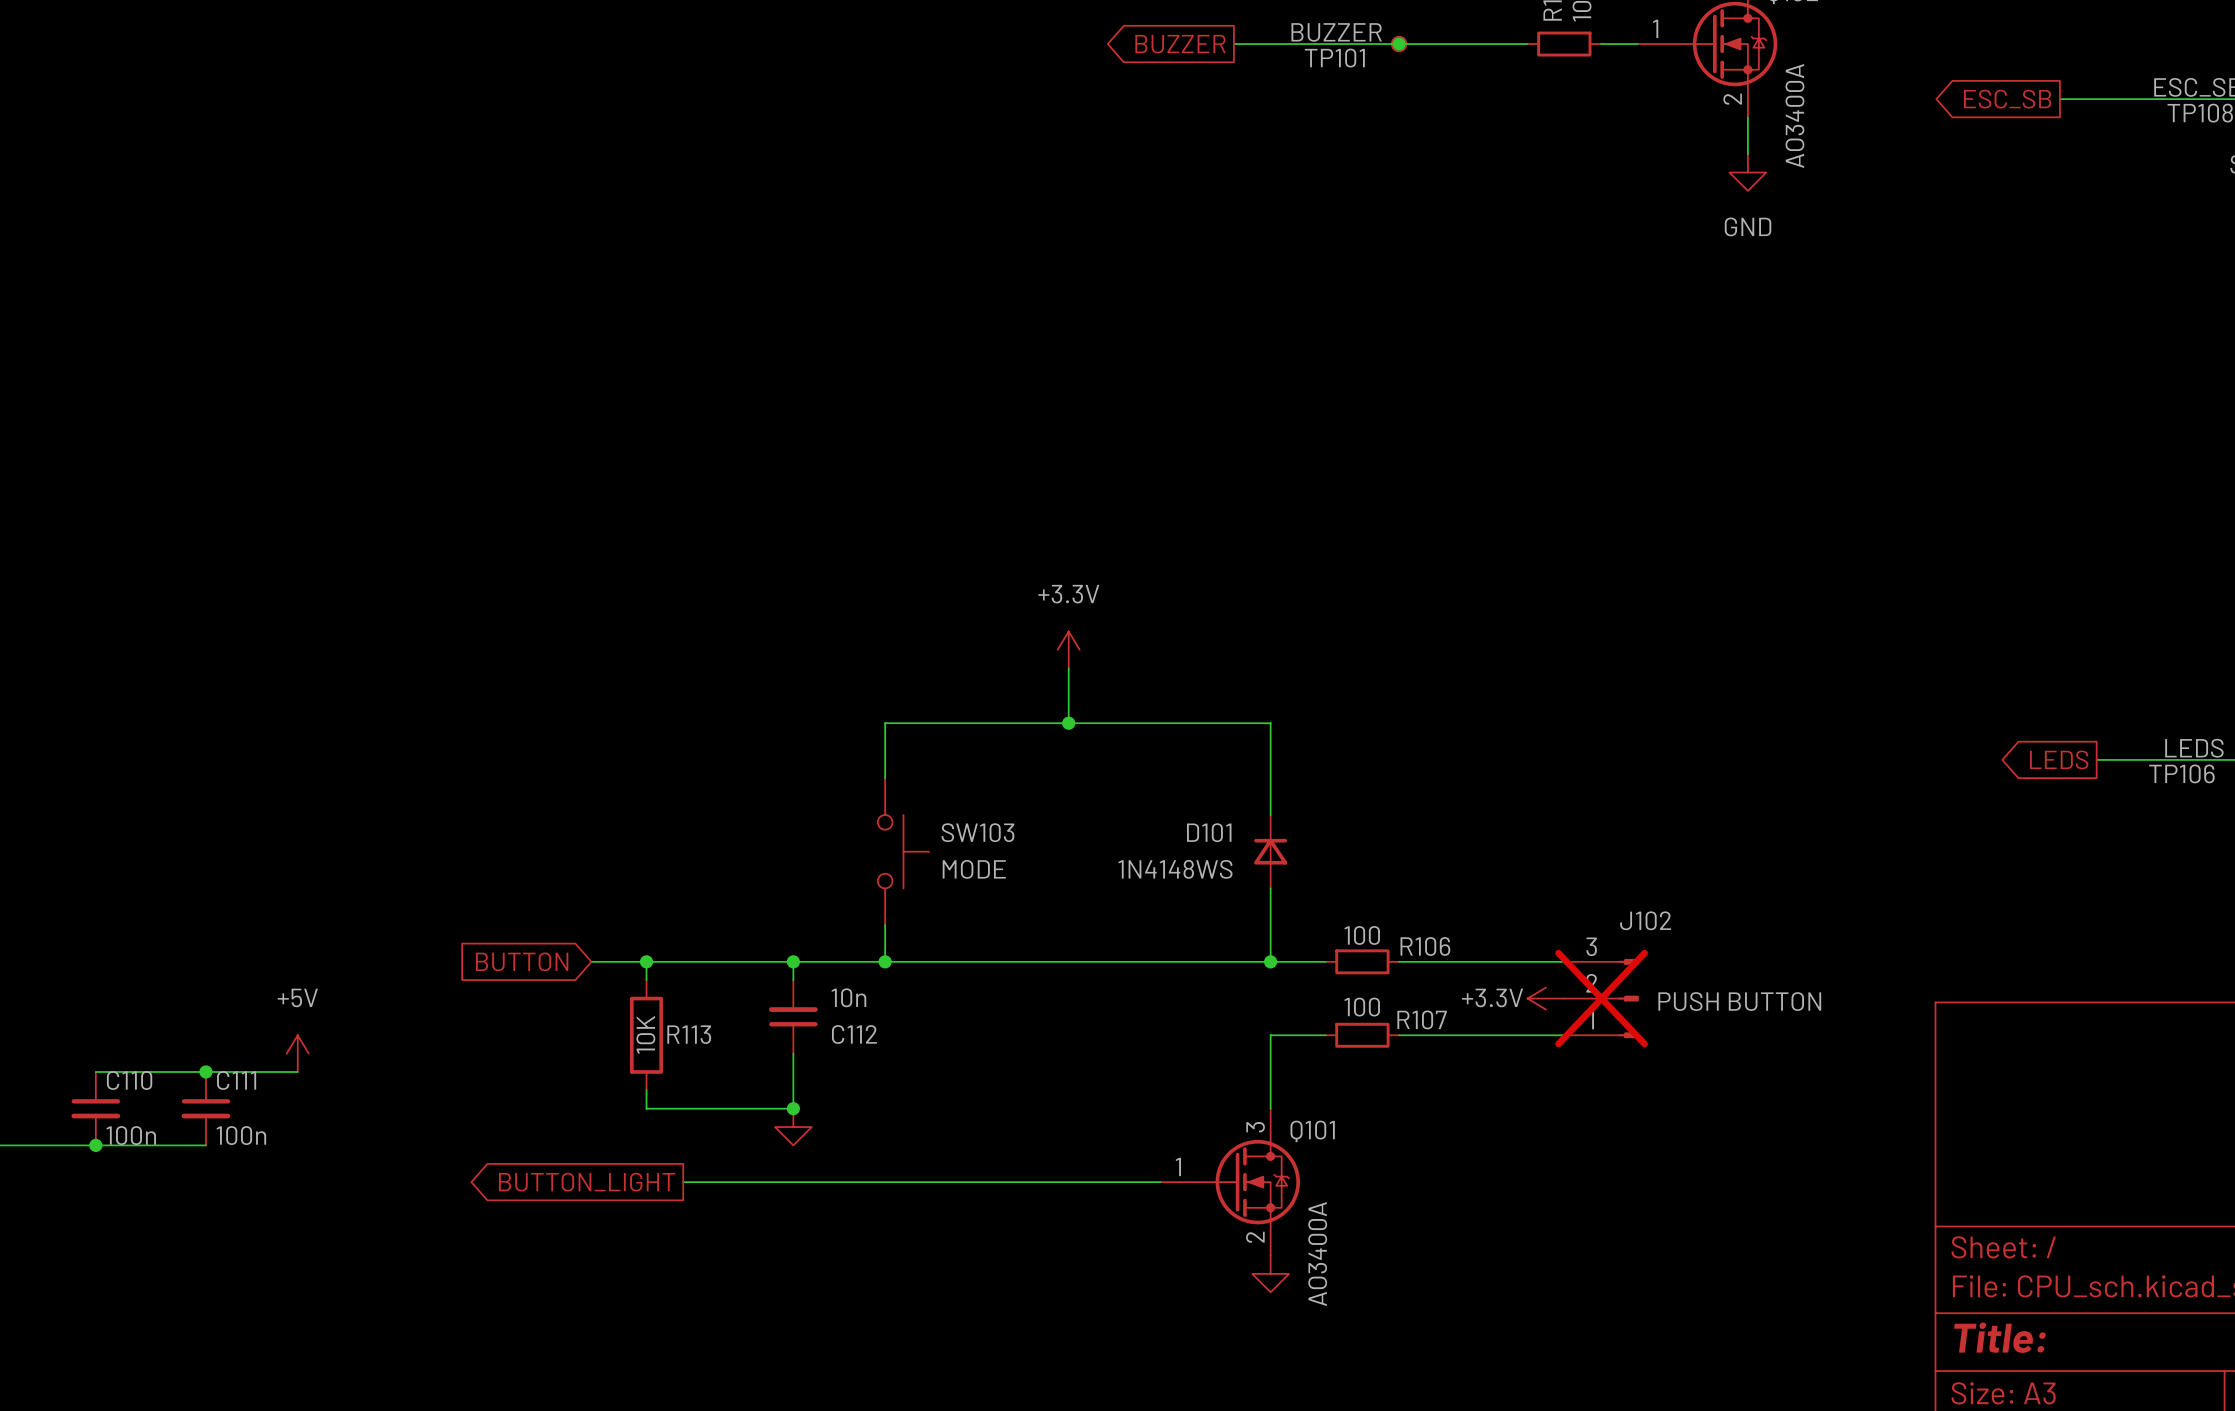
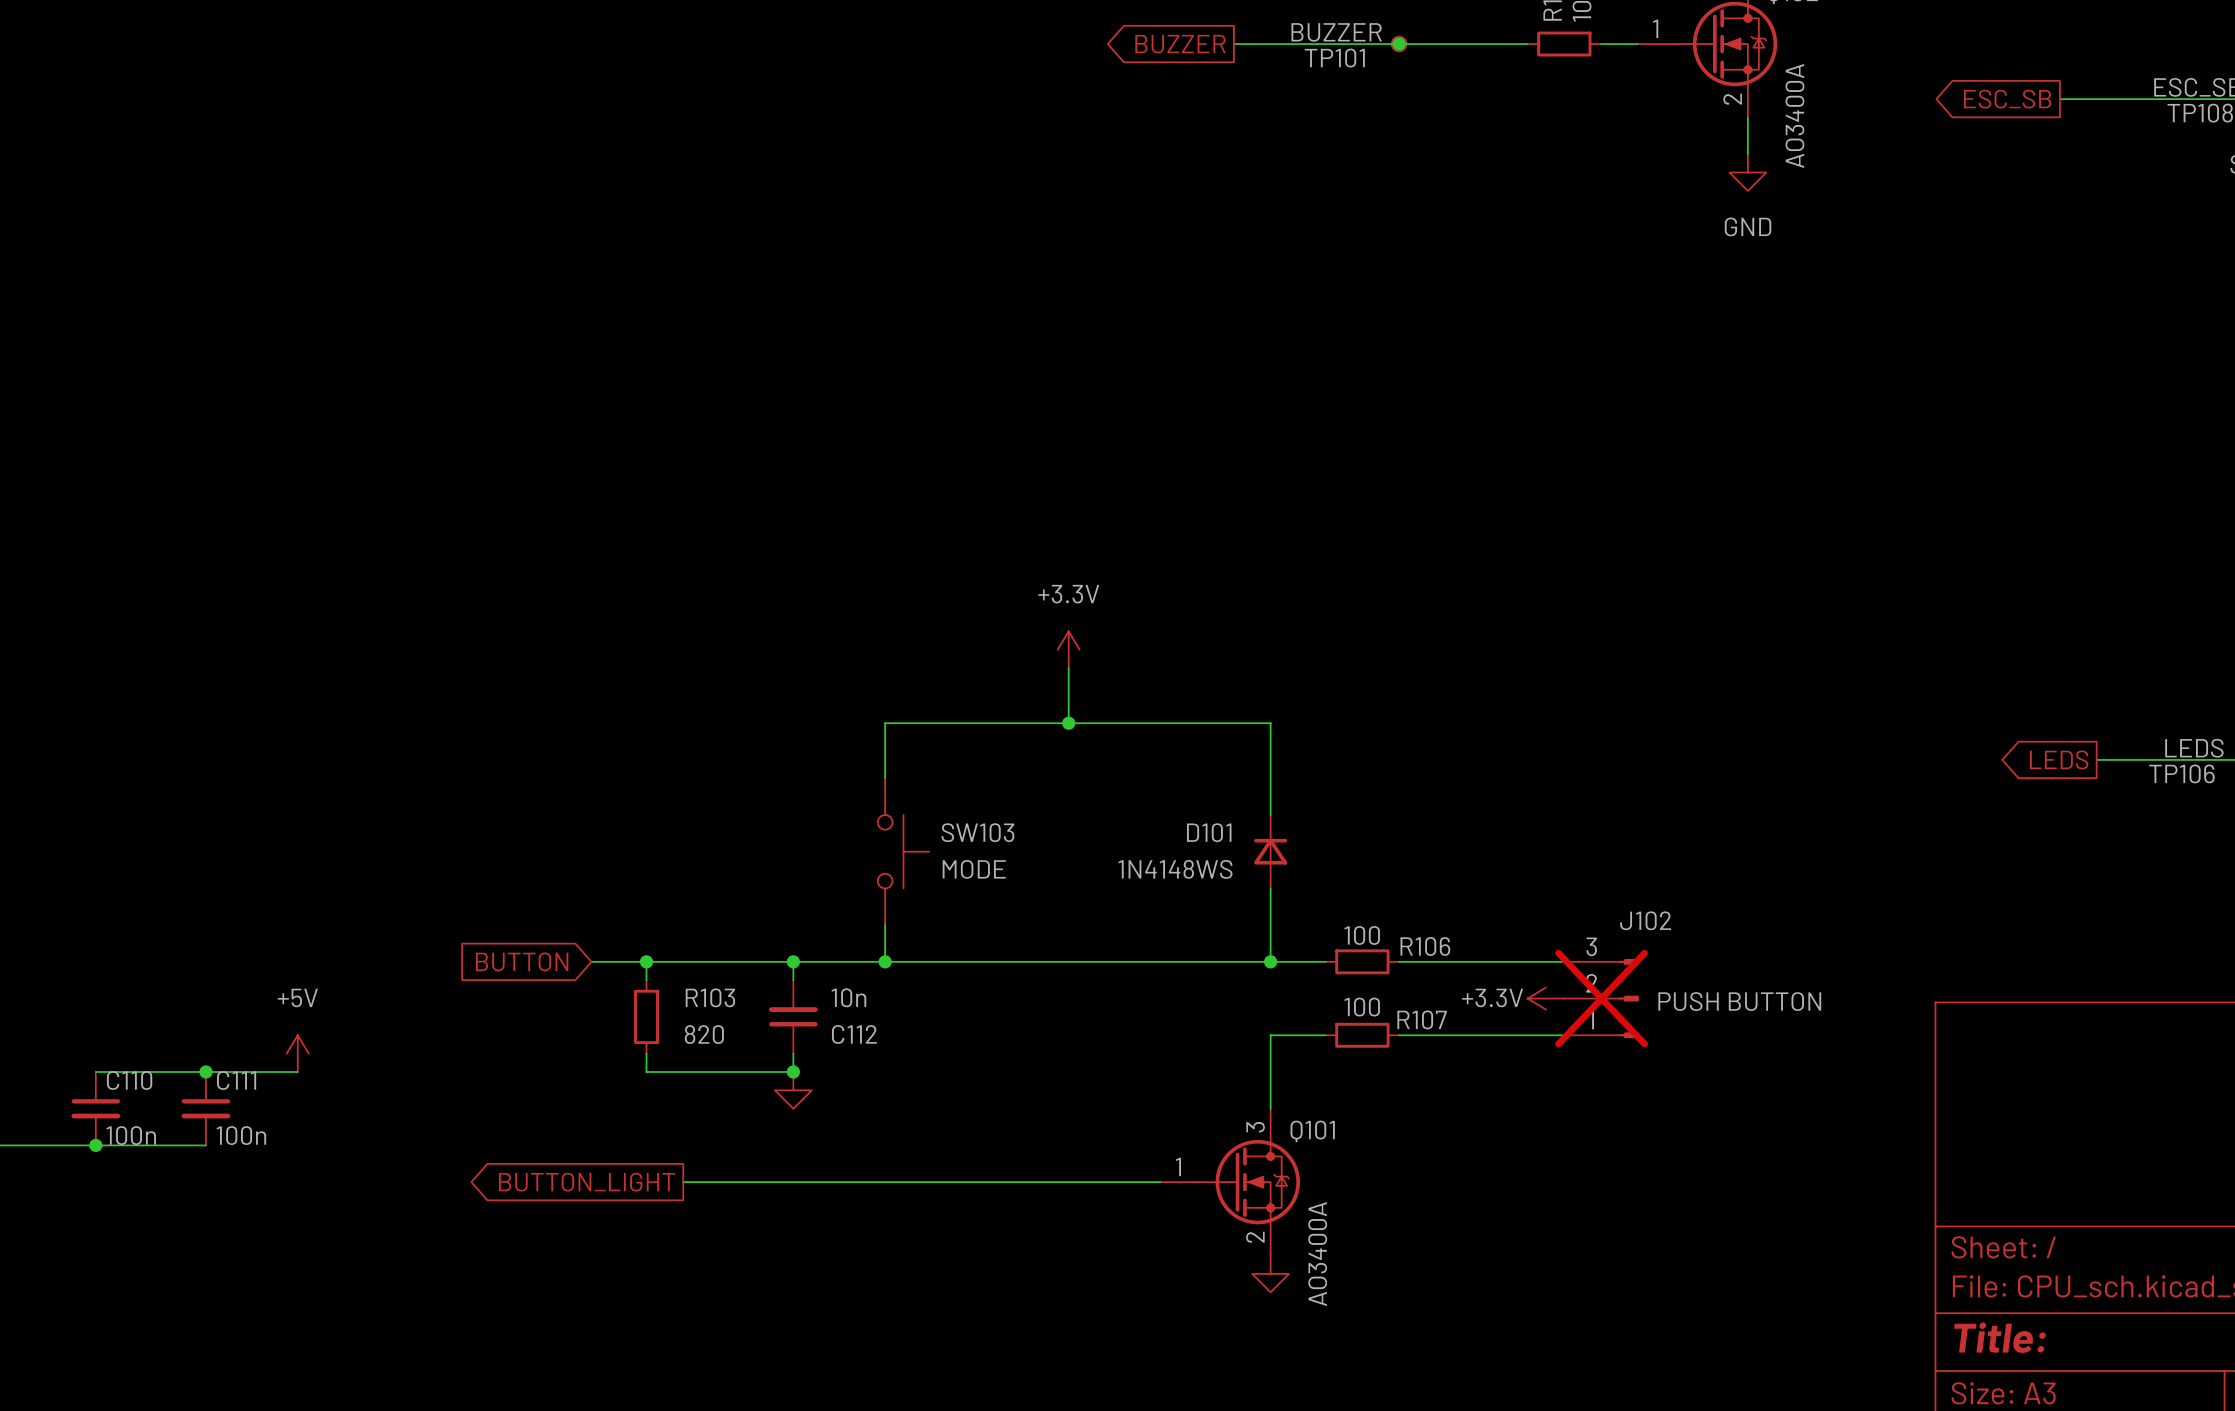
R103: none -> 820 (646, 1016)
R113: 10K (646, 1035) -> none
wire: (793, 1071) (793, 1108) (646, 1108) (646, 1090) -> (793, 1071) (646, 1071) (646, 1053)
junction position: (793, 1108) -> (793, 1071)
power symbol position: (793, 1127) -> (793, 1090)

